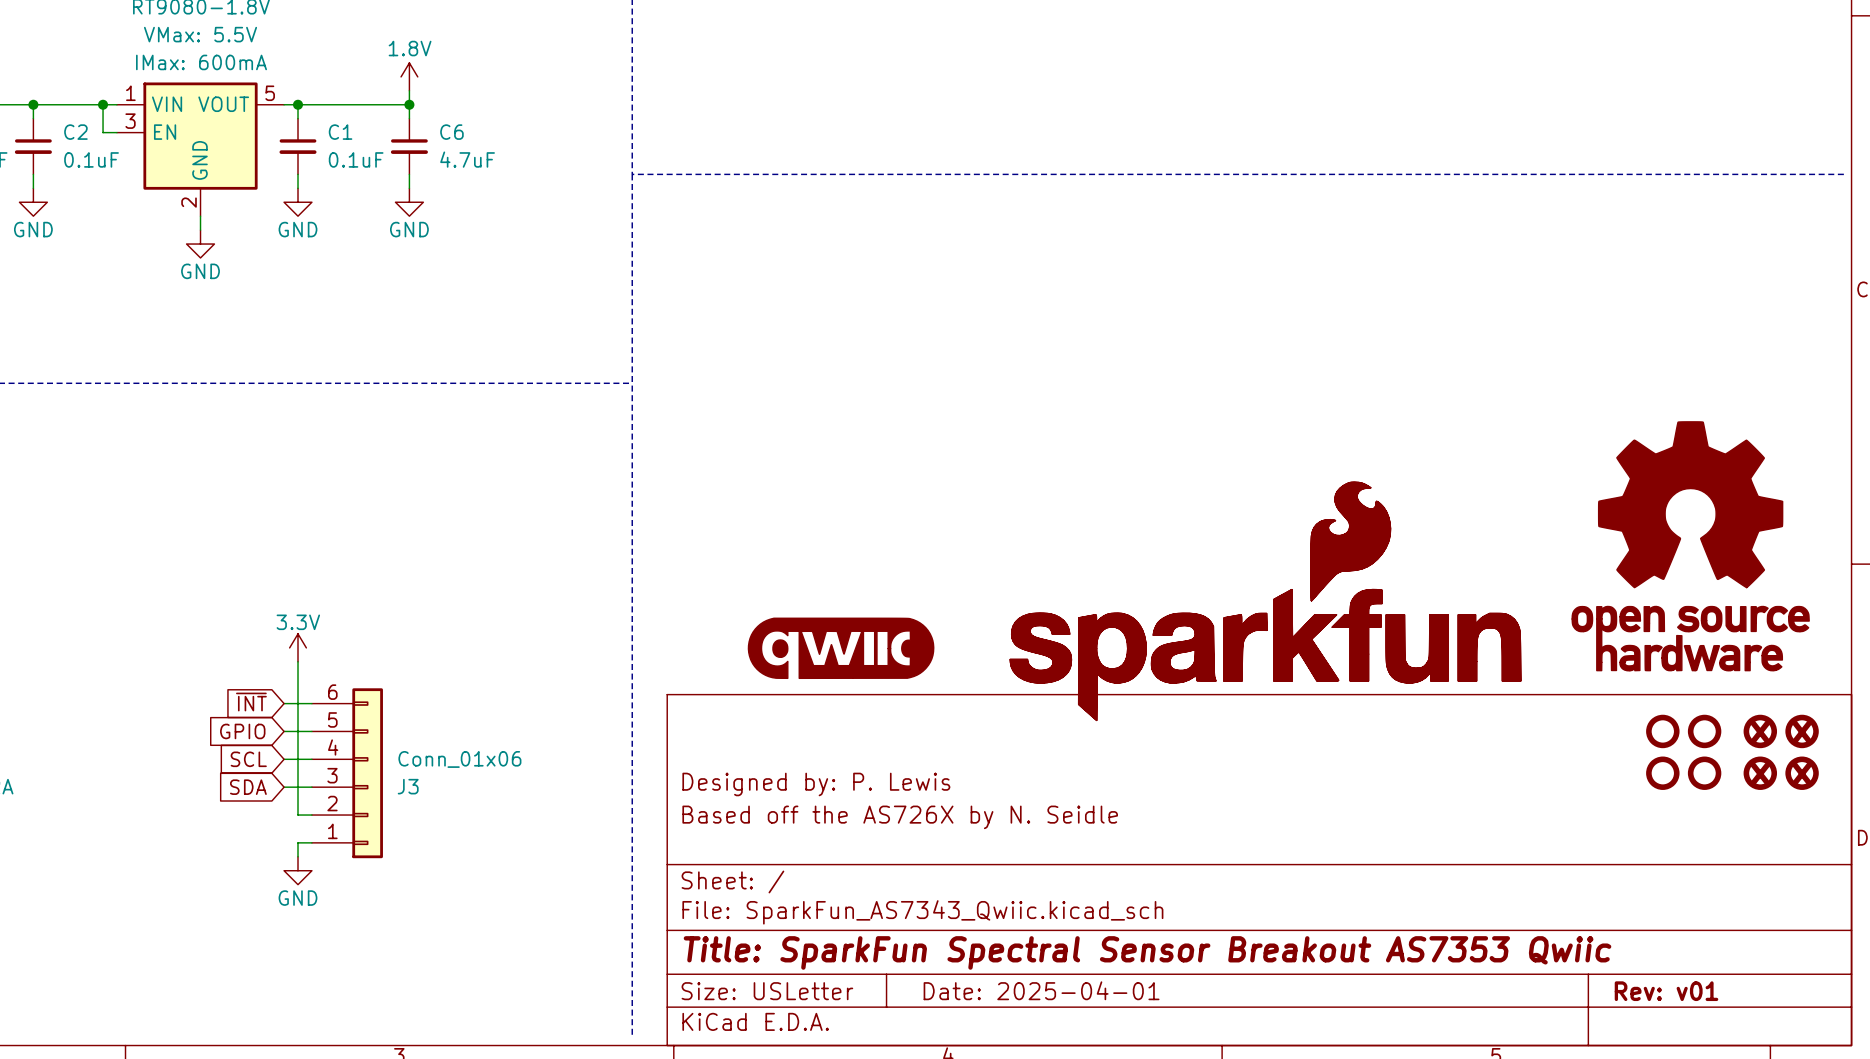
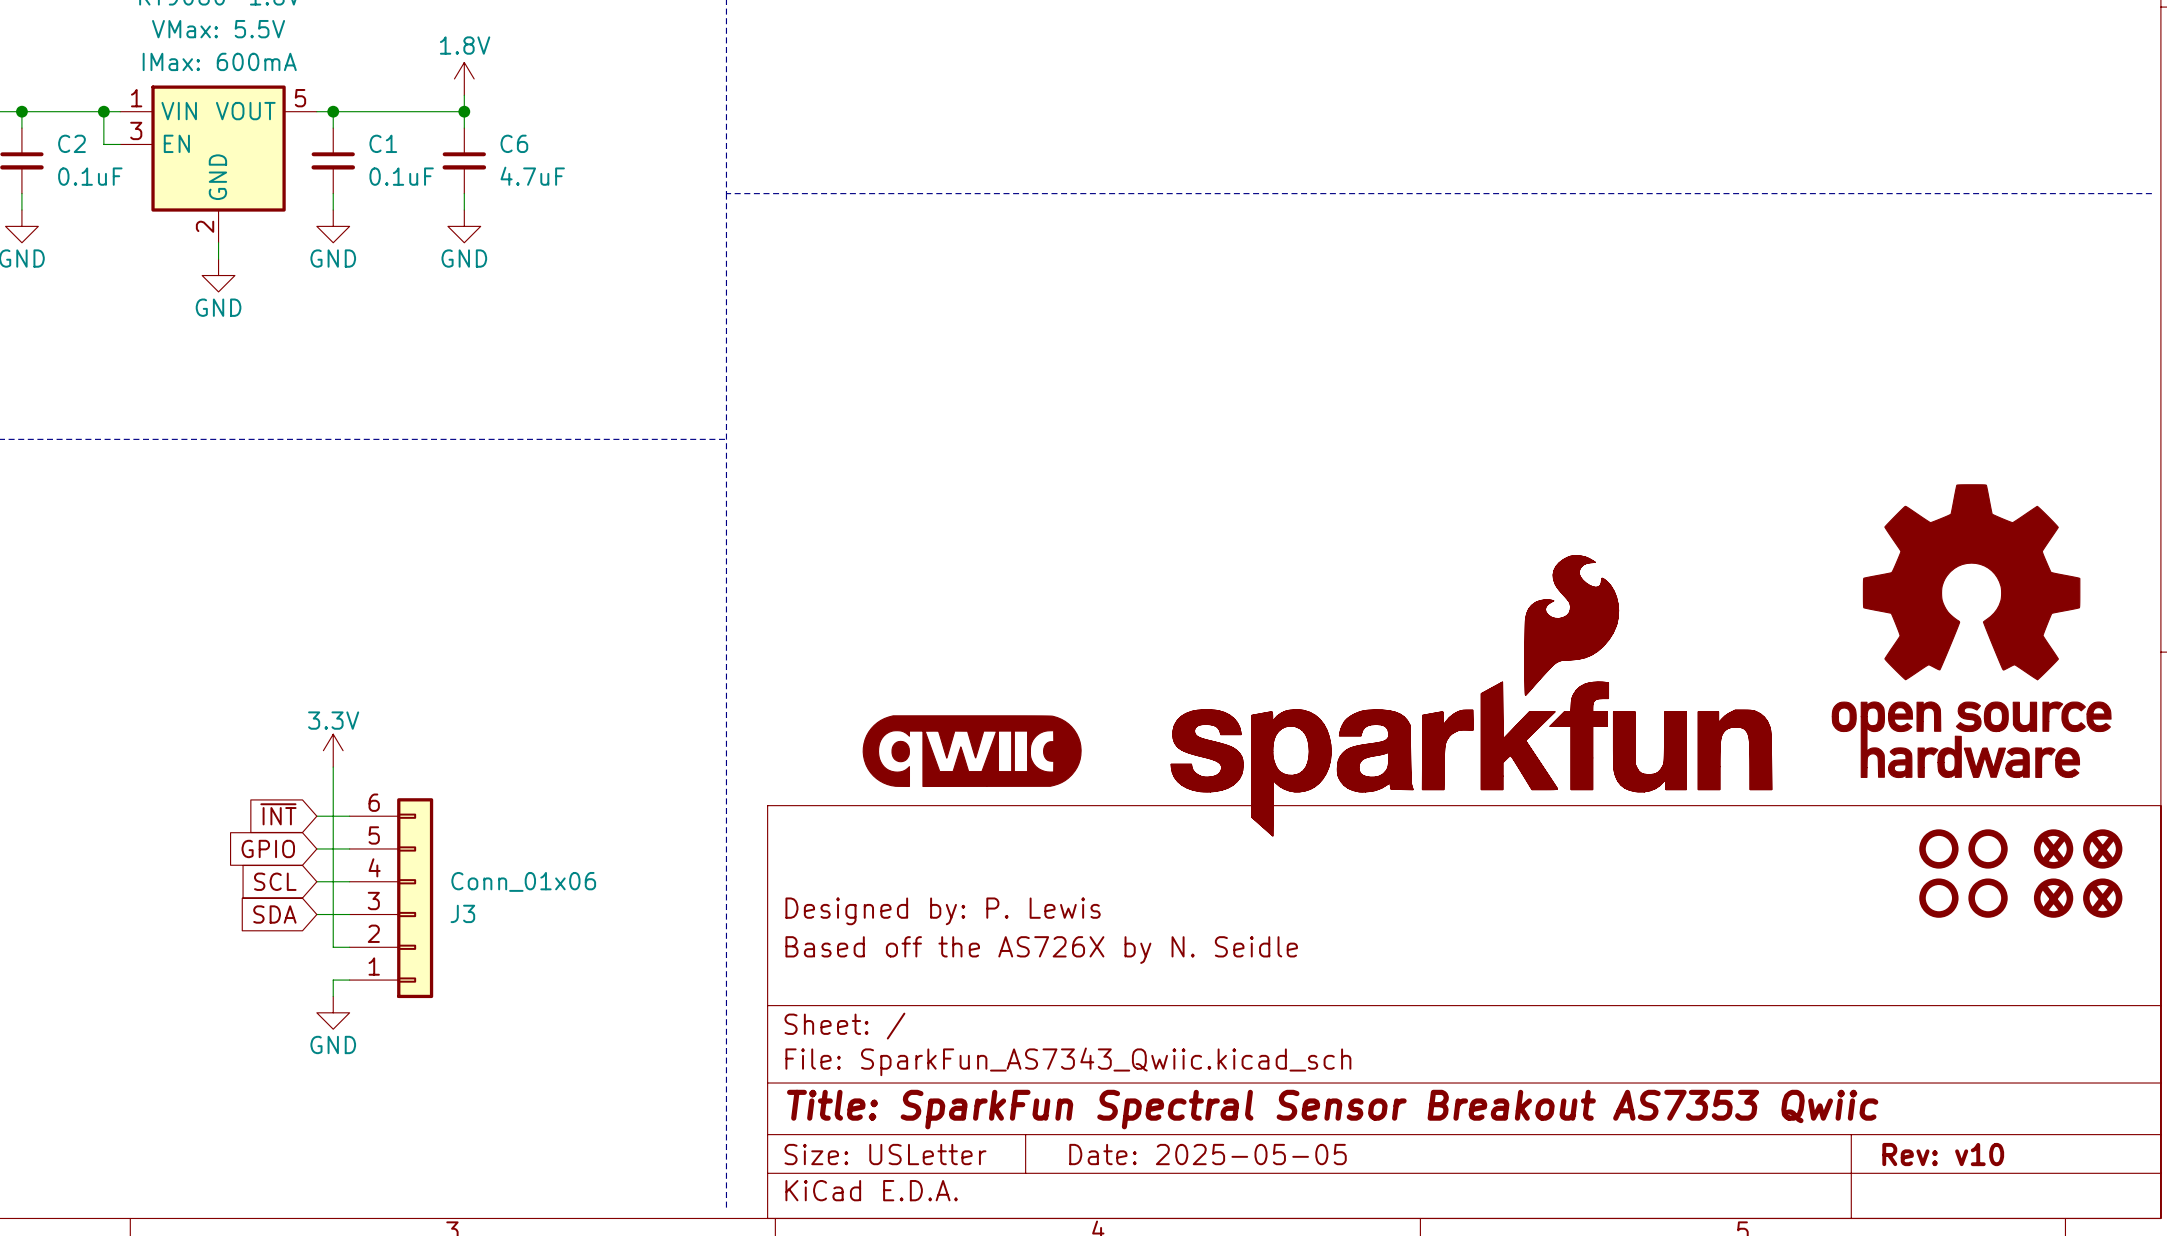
title block: Date: 2025-04-01 (1041, 990) -> Date: 2025-05-05 (1208, 1154)
title block: Rev: v01 (1666, 991) -> Rev: v10 (1943, 1154)

